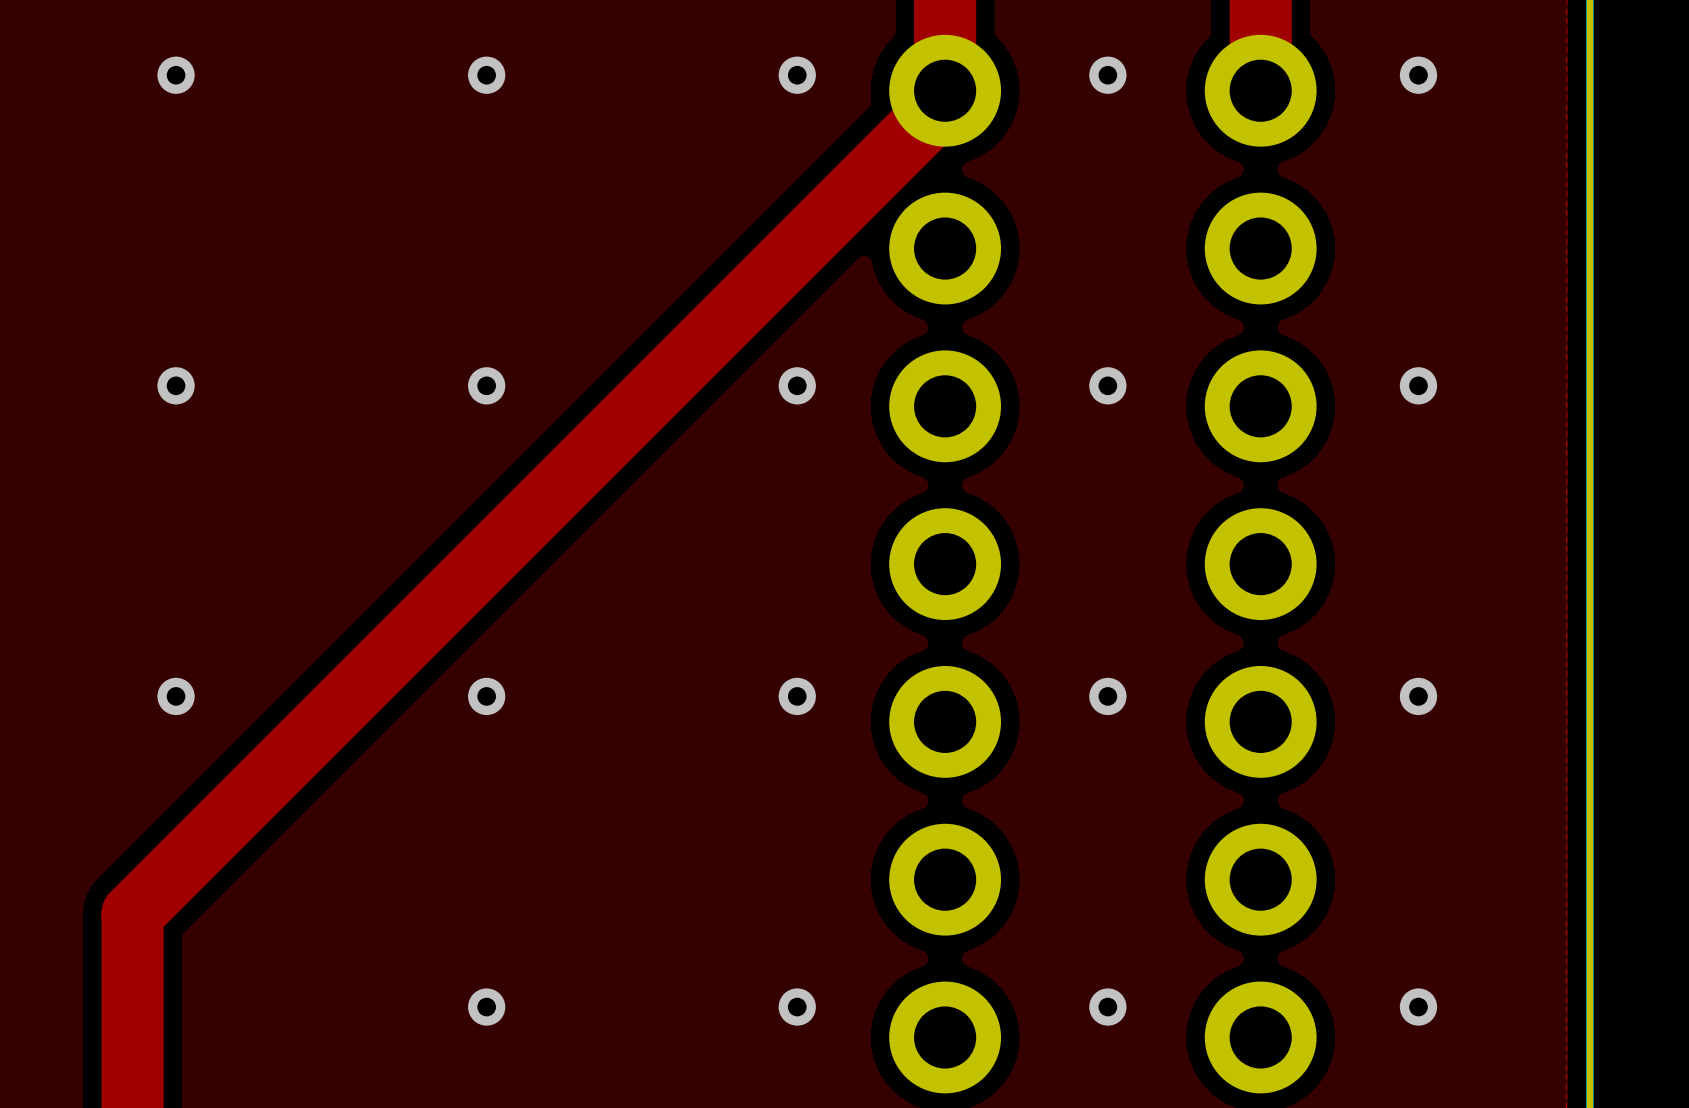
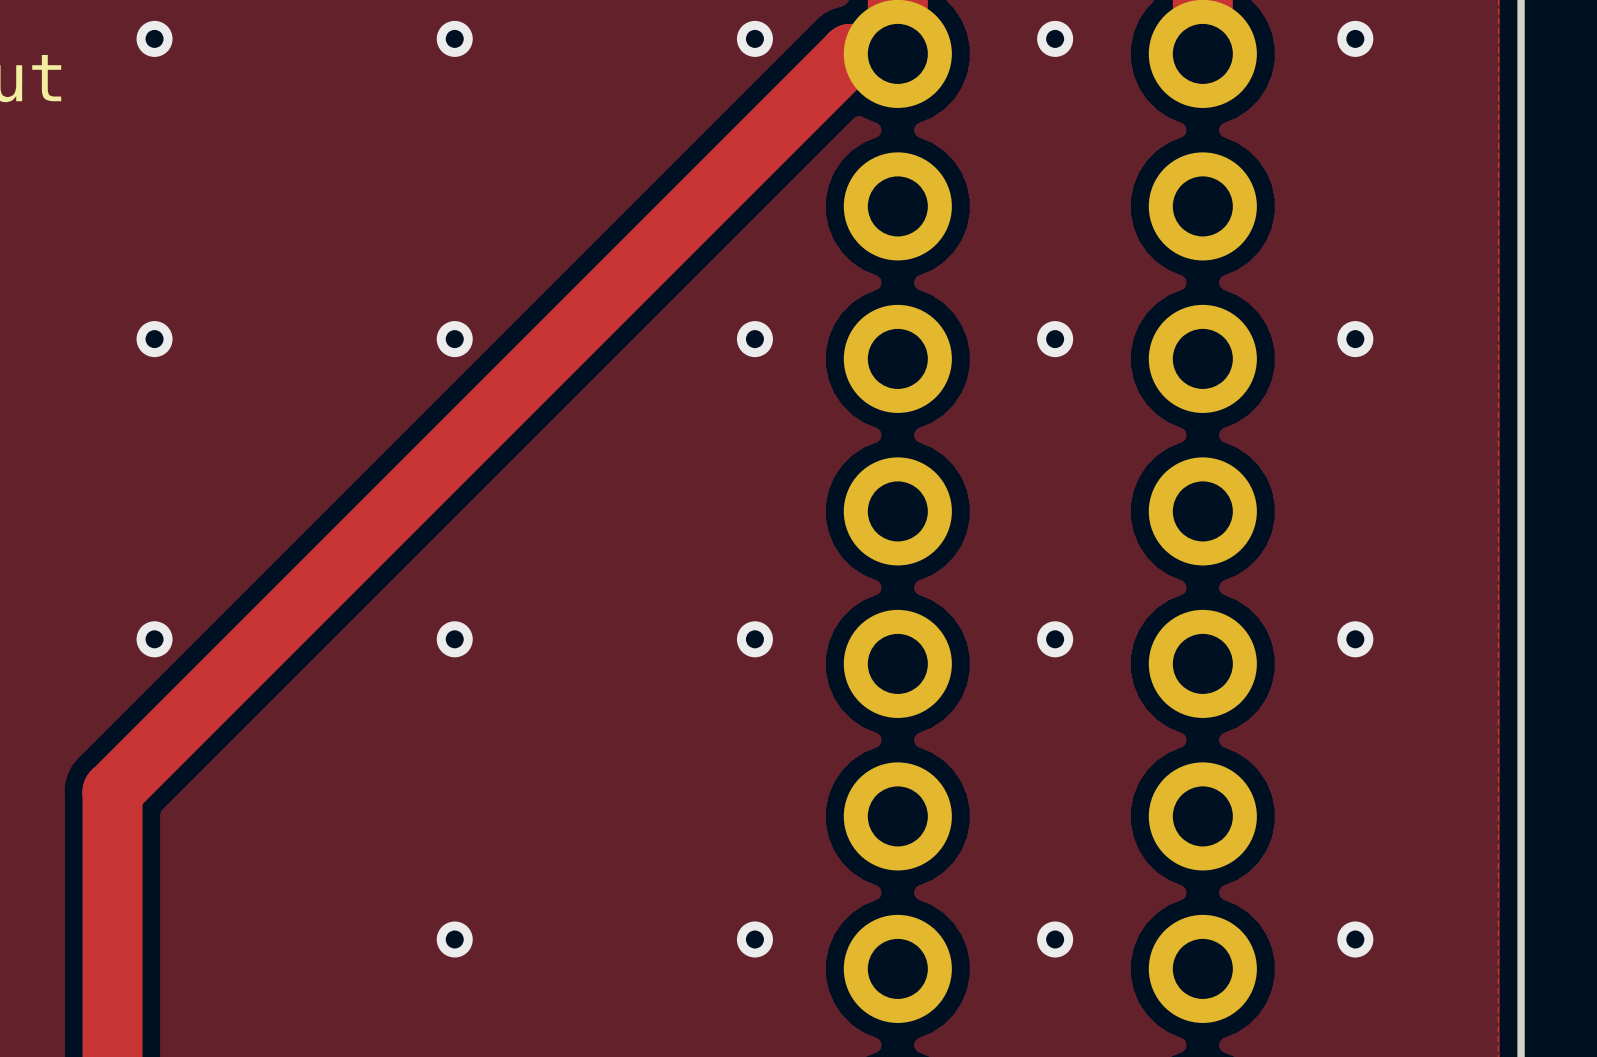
track: (945, 90) (945, 101) (132, 913) -> (897, 53) (850, 53) (112, 791) (112, 849)

